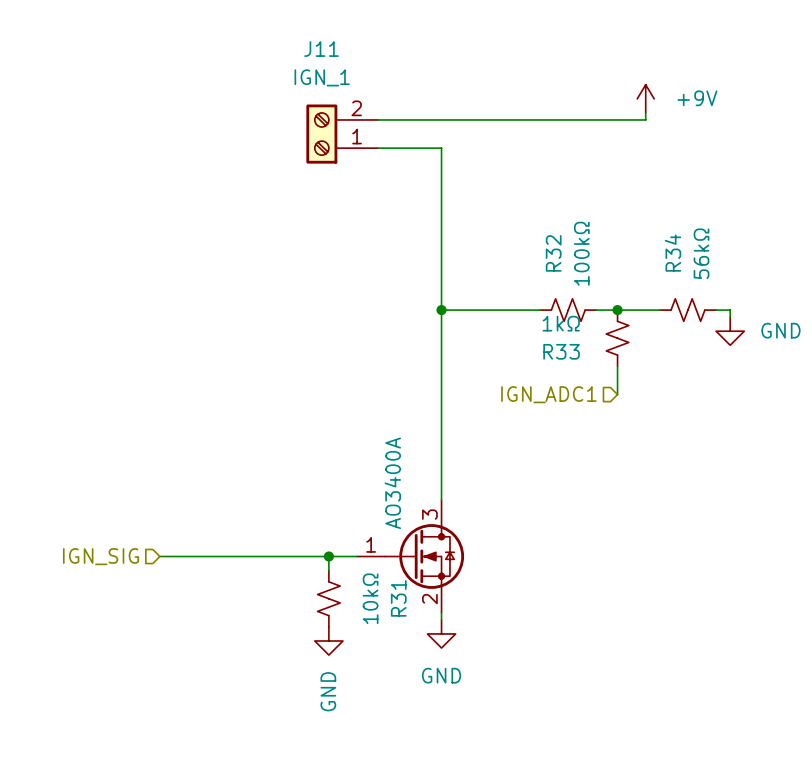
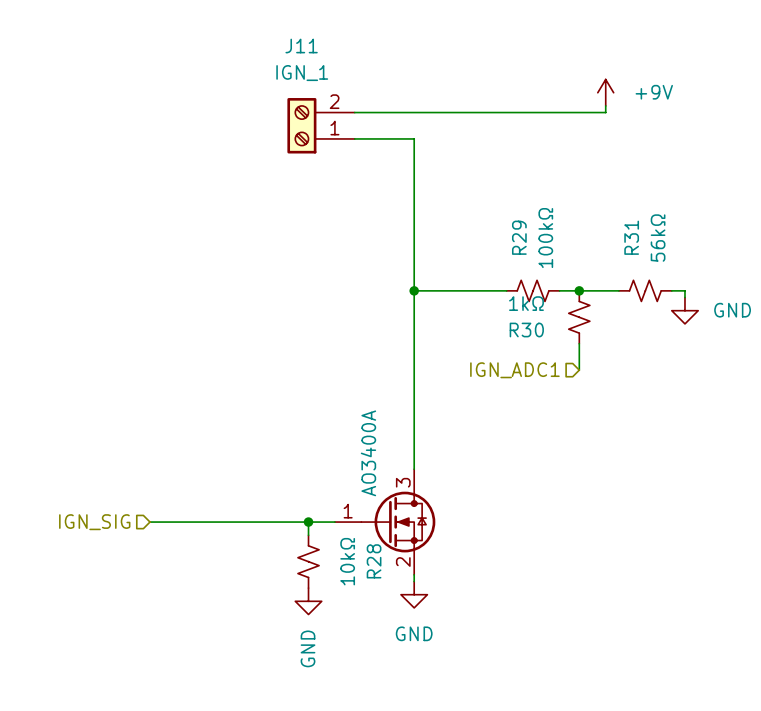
R32 name: R32 (553, 253) -> R29 (519, 237)
R34 name: R34 (673, 253) -> R31 (631, 237)
R33 name: R33 (561, 351) -> R30 (526, 330)
R31 name: R31 (398, 598) -> R28 (374, 561)

